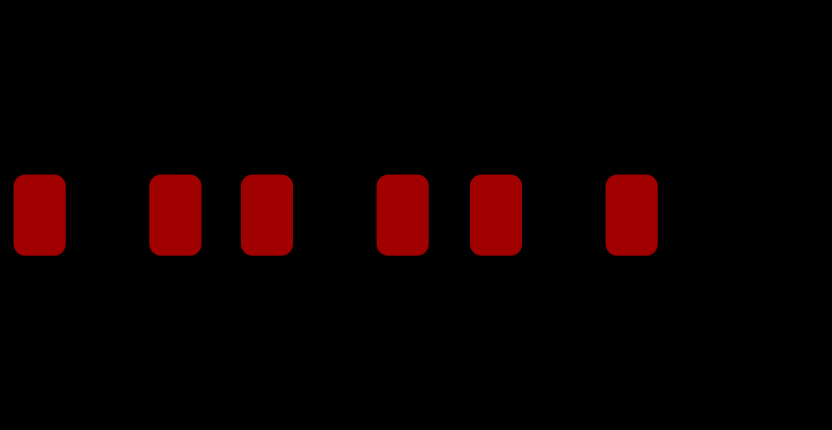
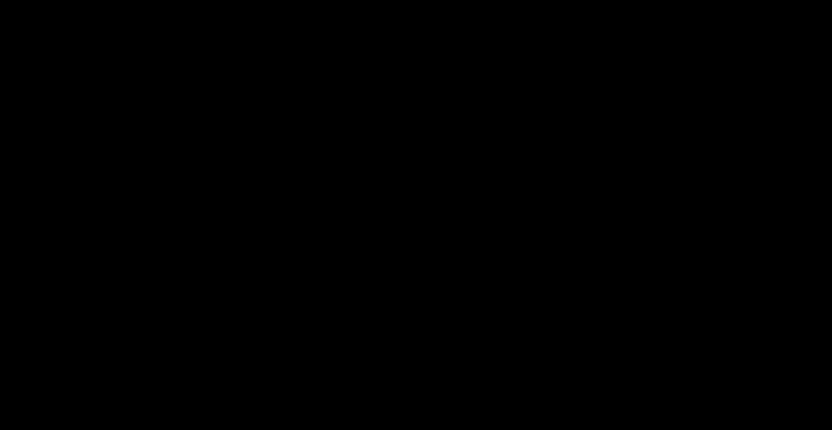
part: (107, 215) -> none
part: (334, 215) -> none
part: (563, 215) -> none

